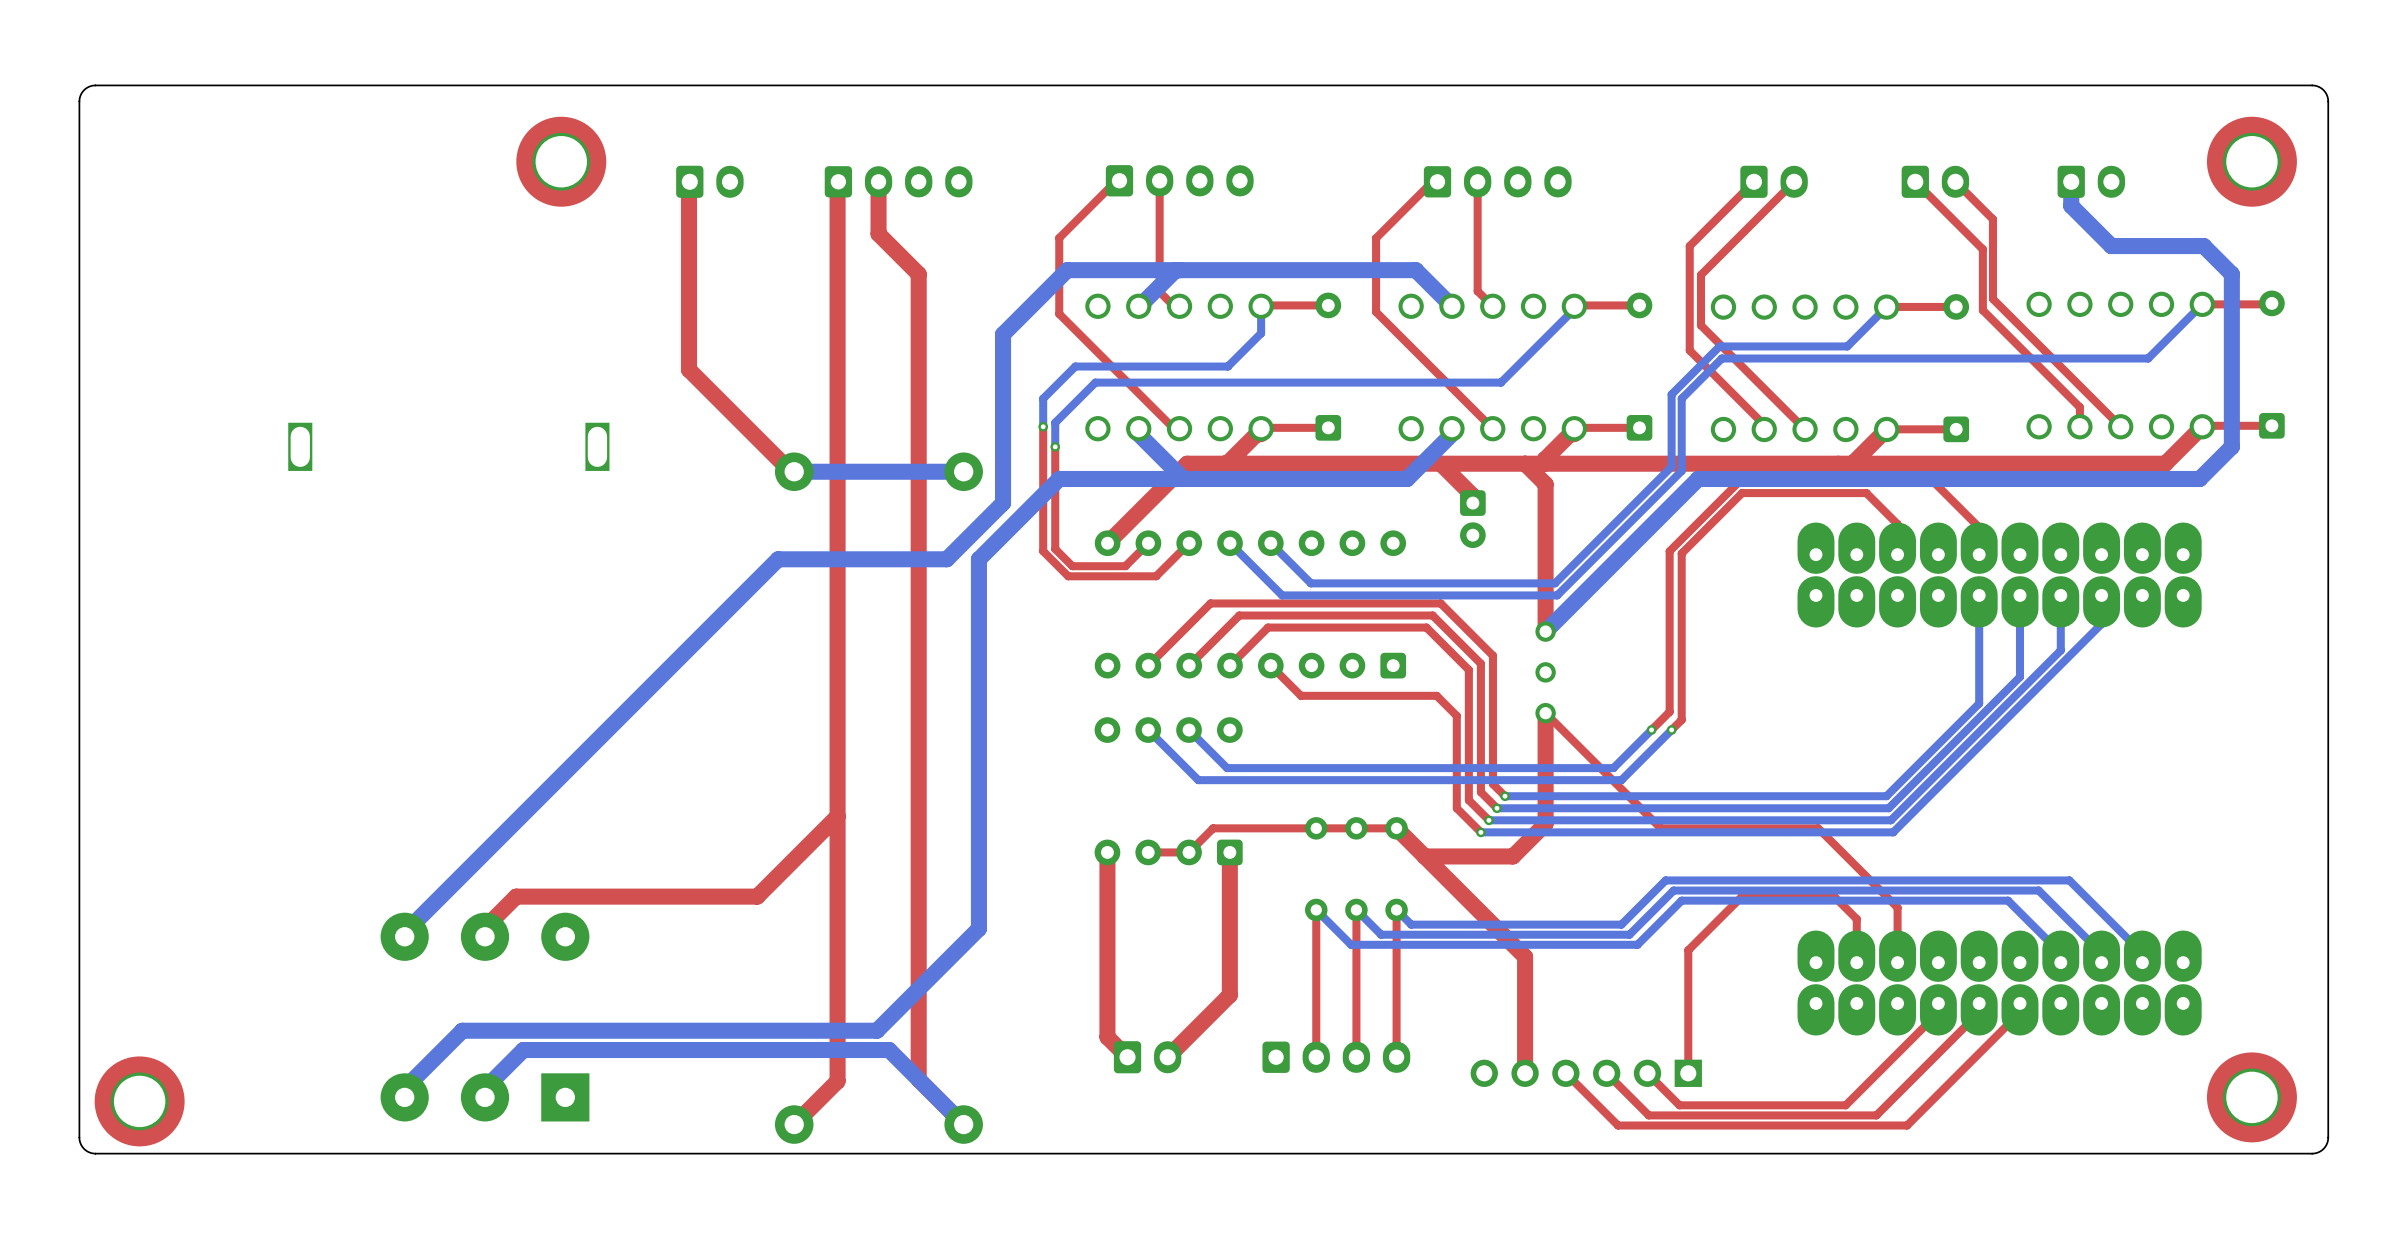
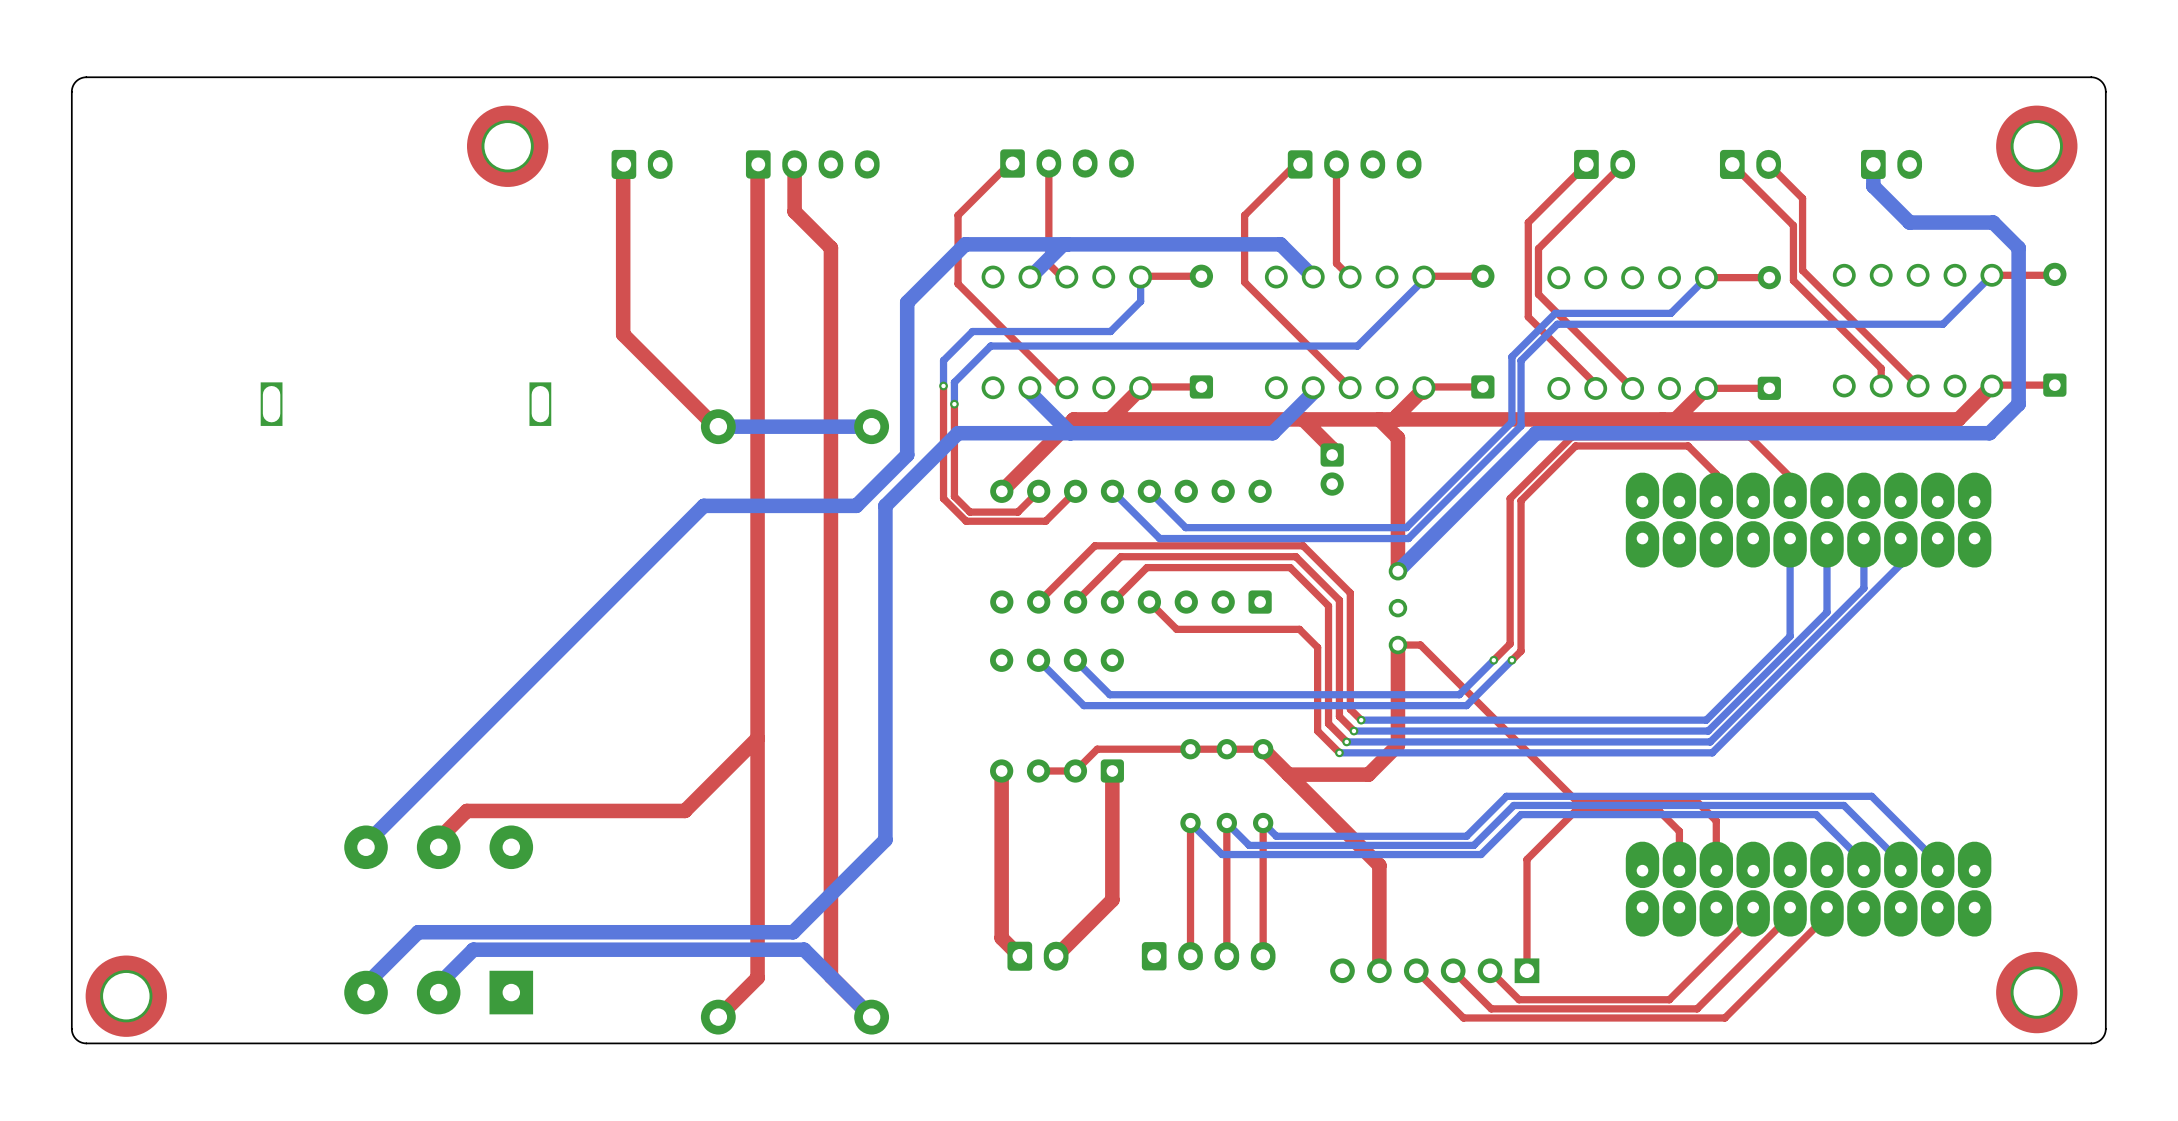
top track: (1545, 713) (1660, 828) (1818, 828) (1874, 884) -> (1397, 645) (1420, 645) (1575, 800) (1695, 800)

